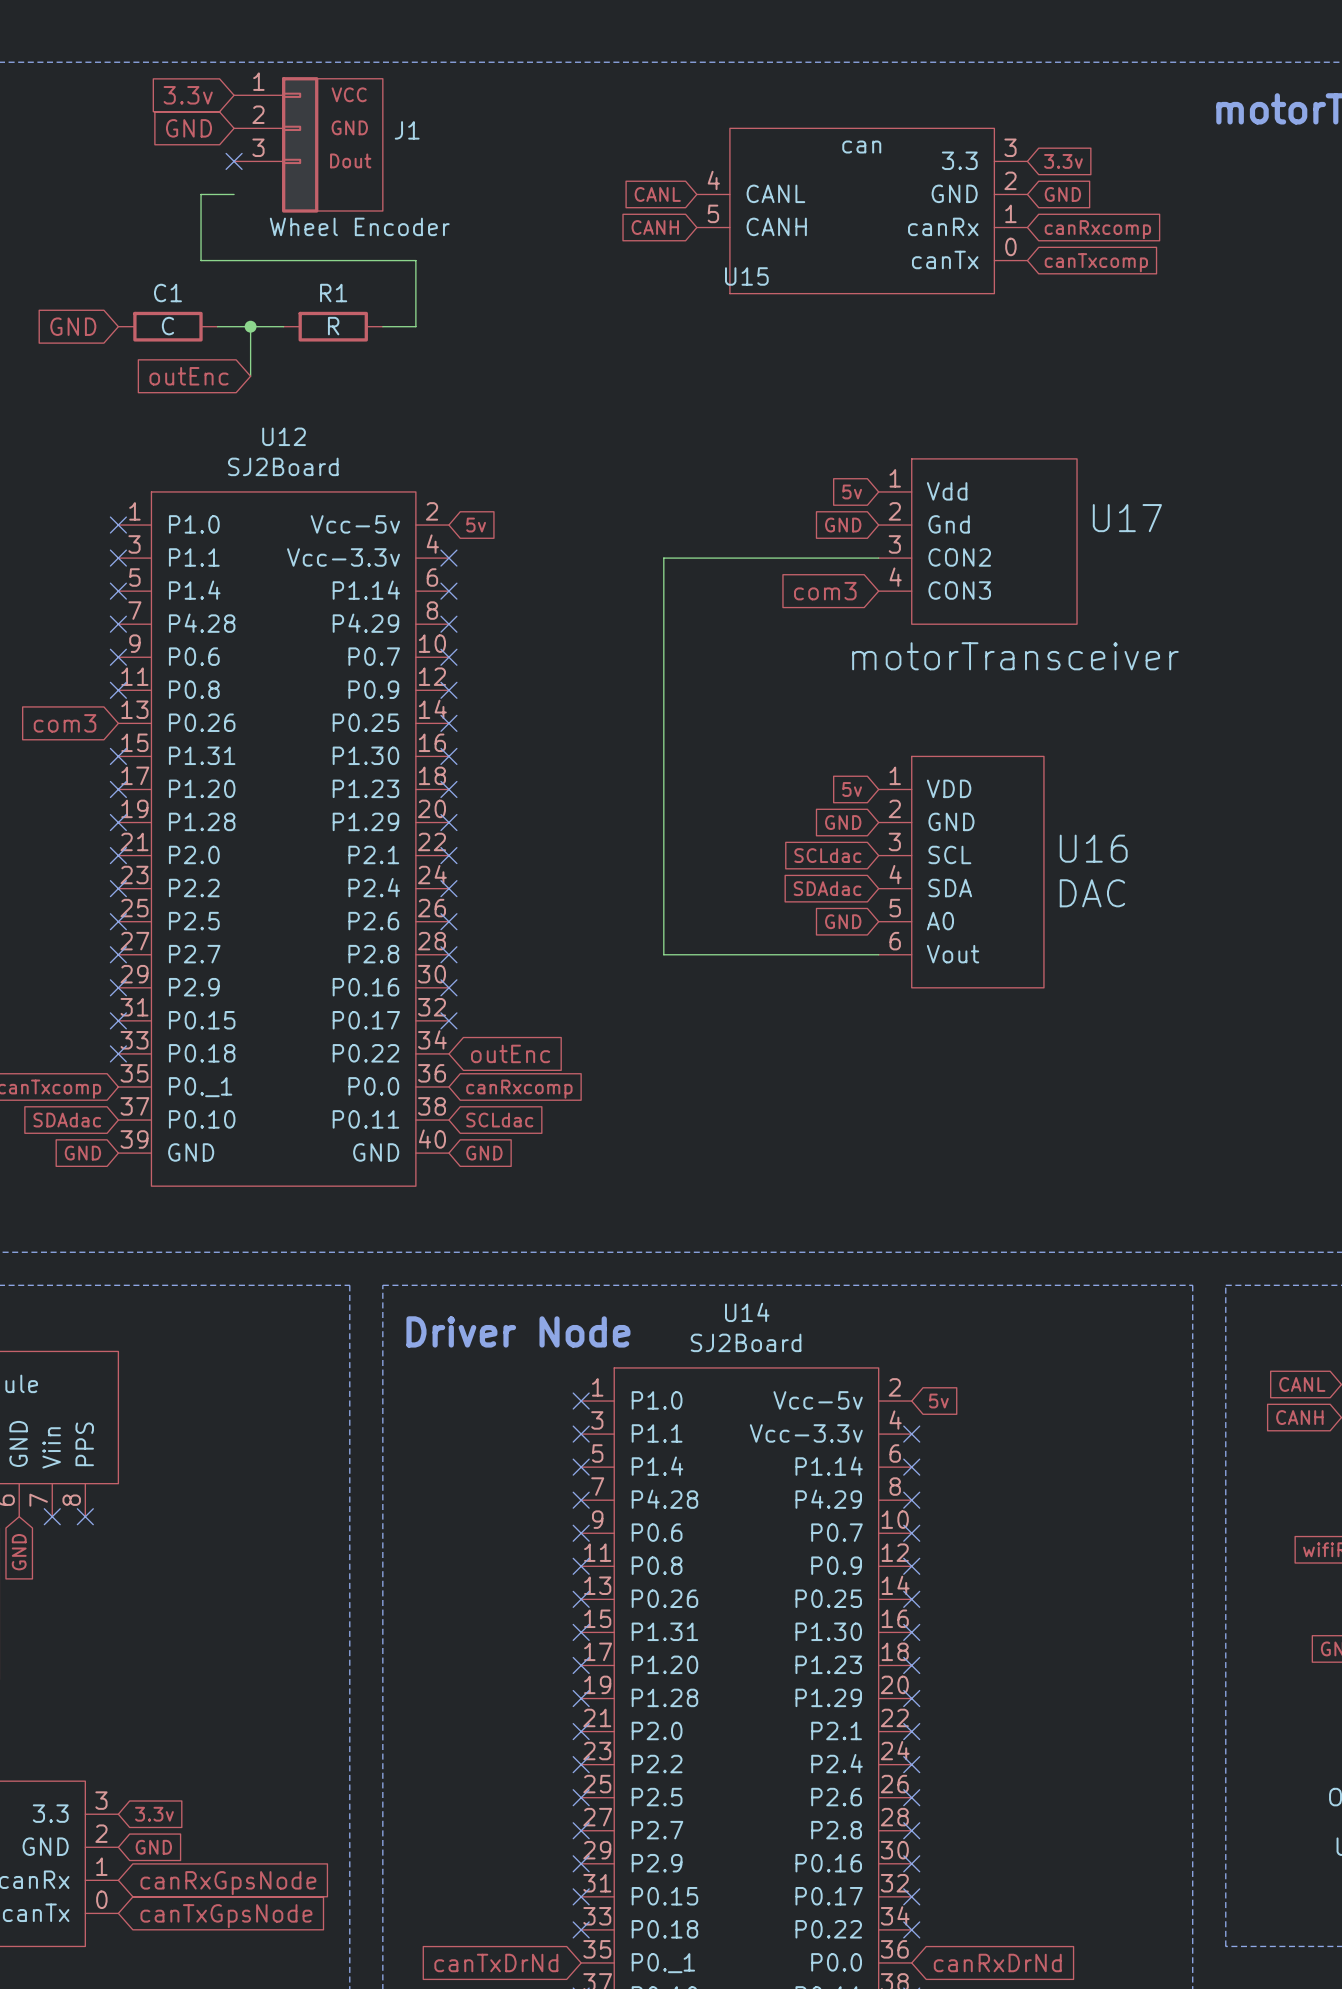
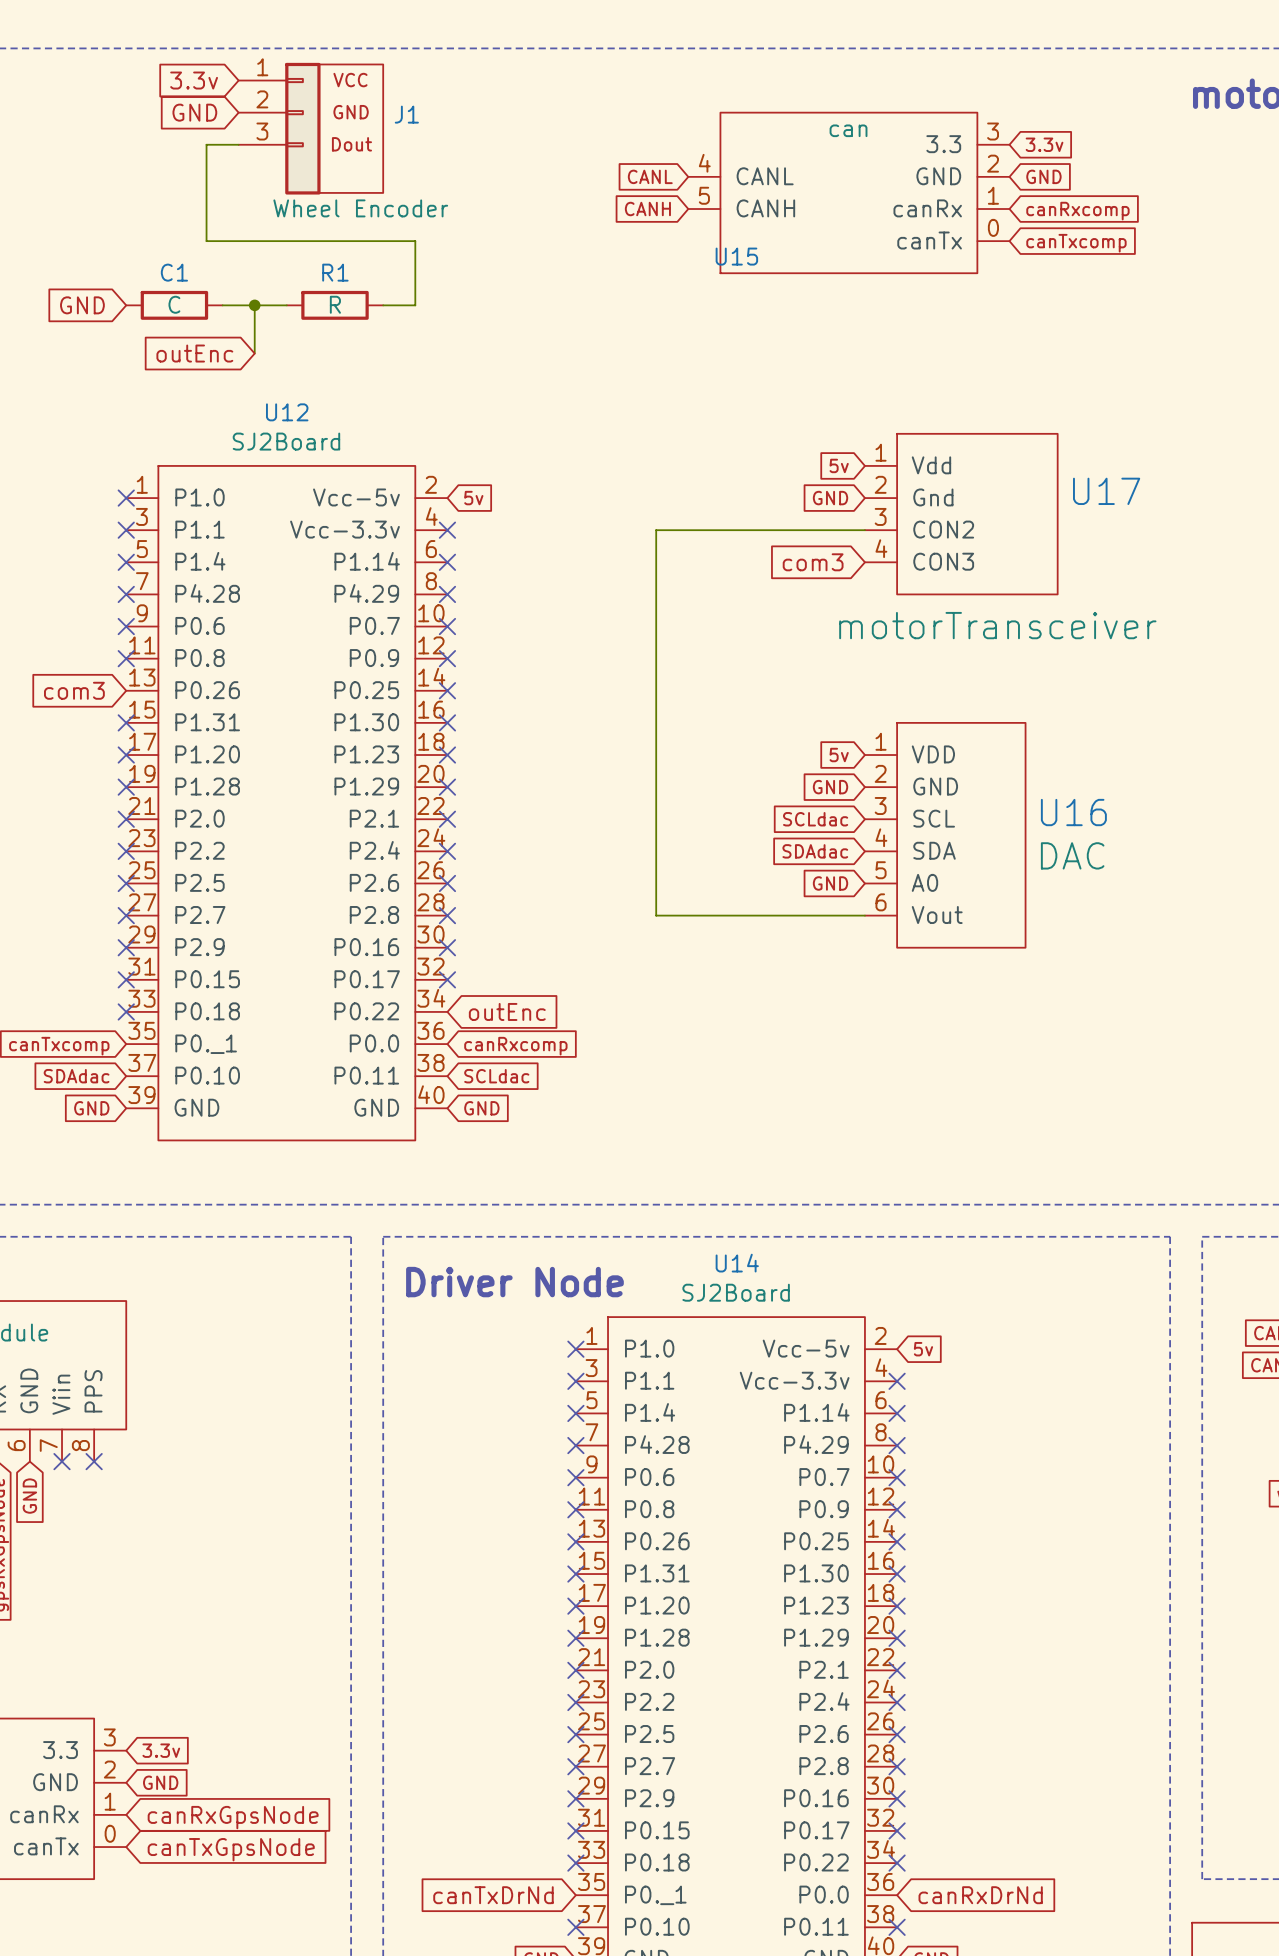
no-connect mark: (234, 161) -> none
wire: (201, 194) (234, 194) -> (206, 176) (206, 144) (238, 144)

